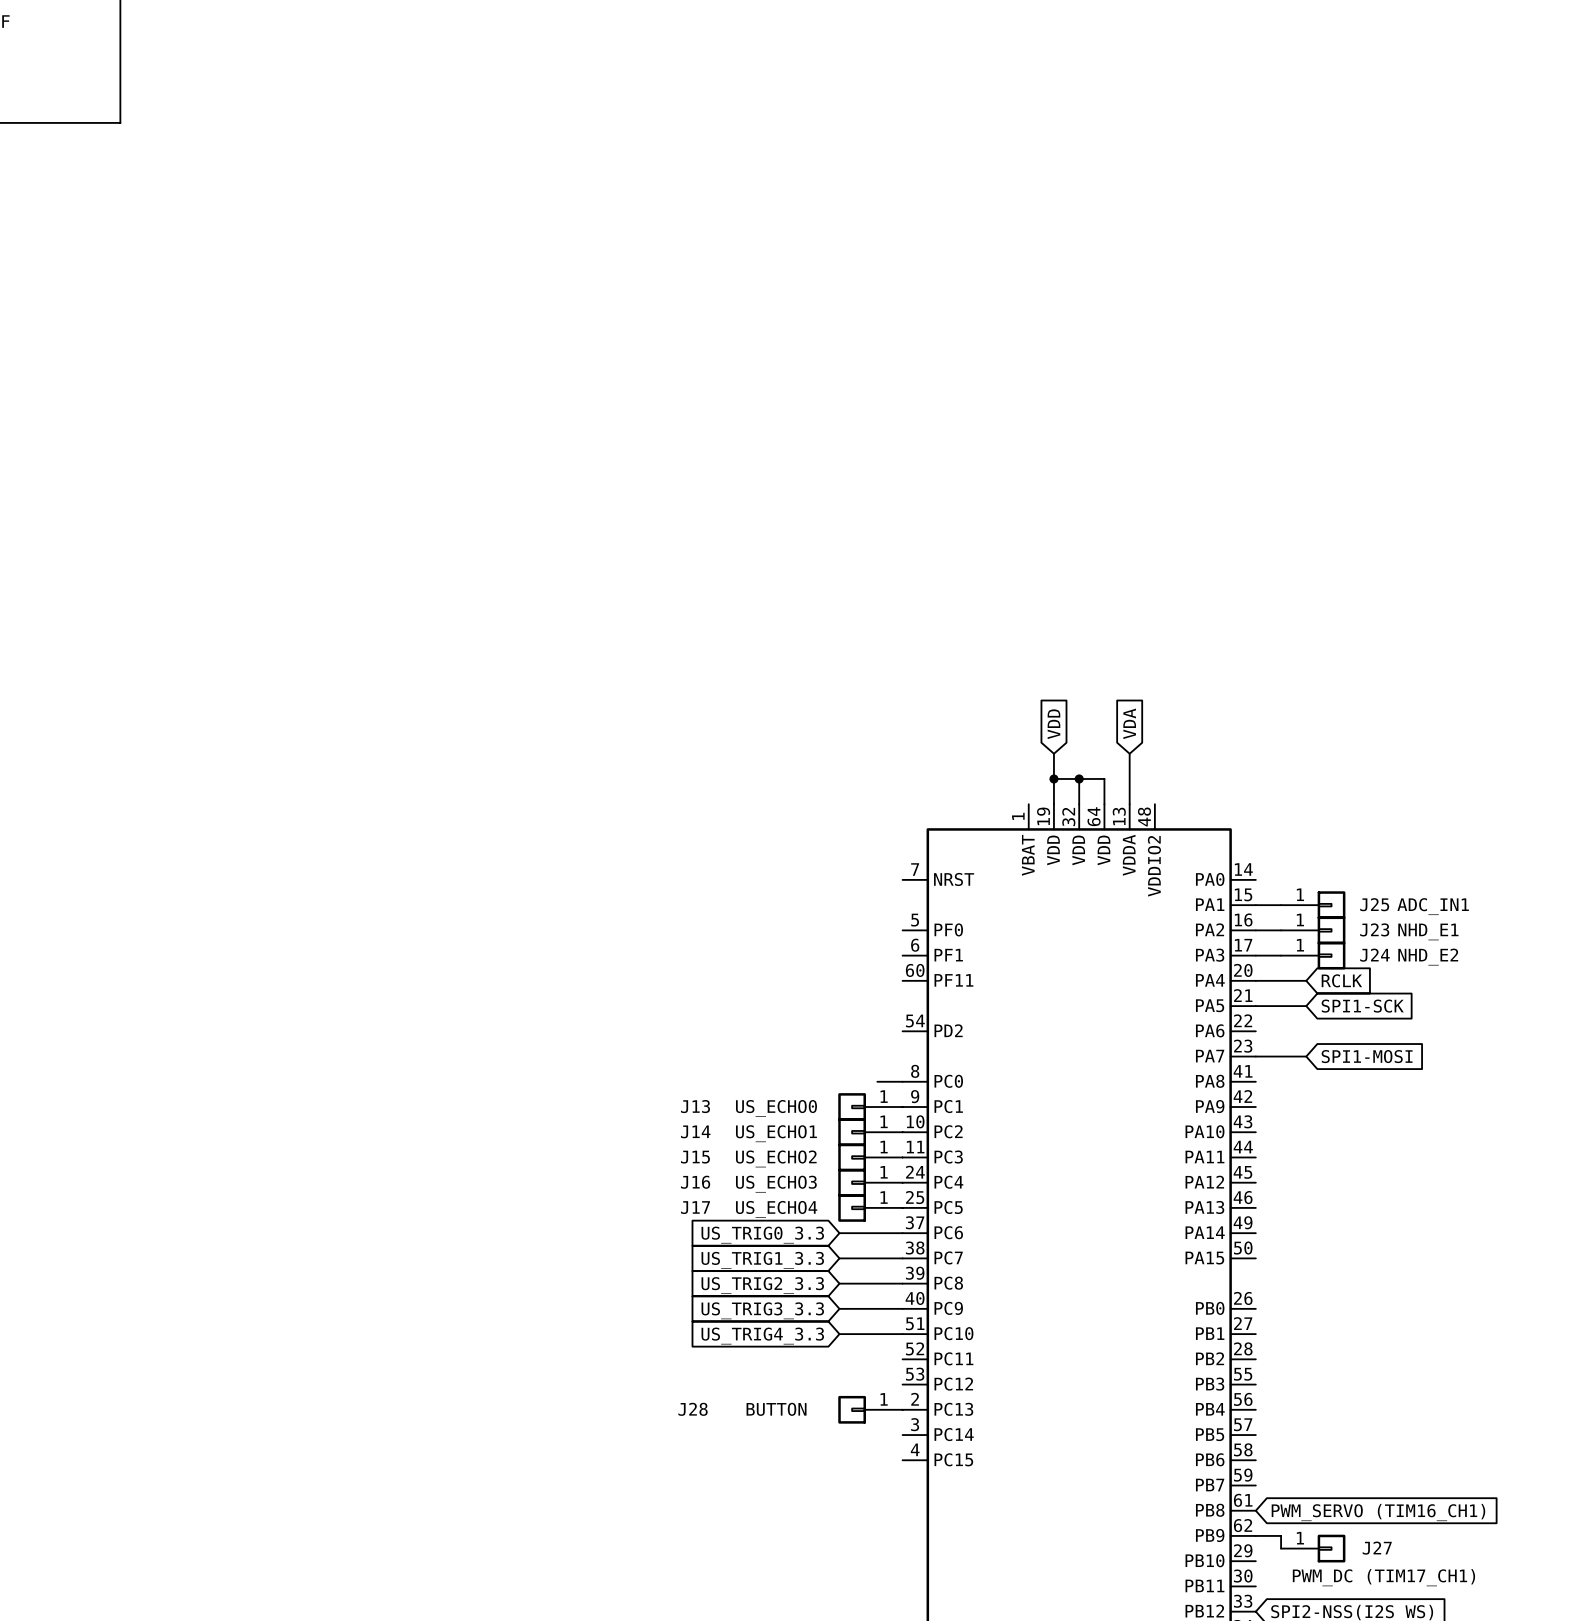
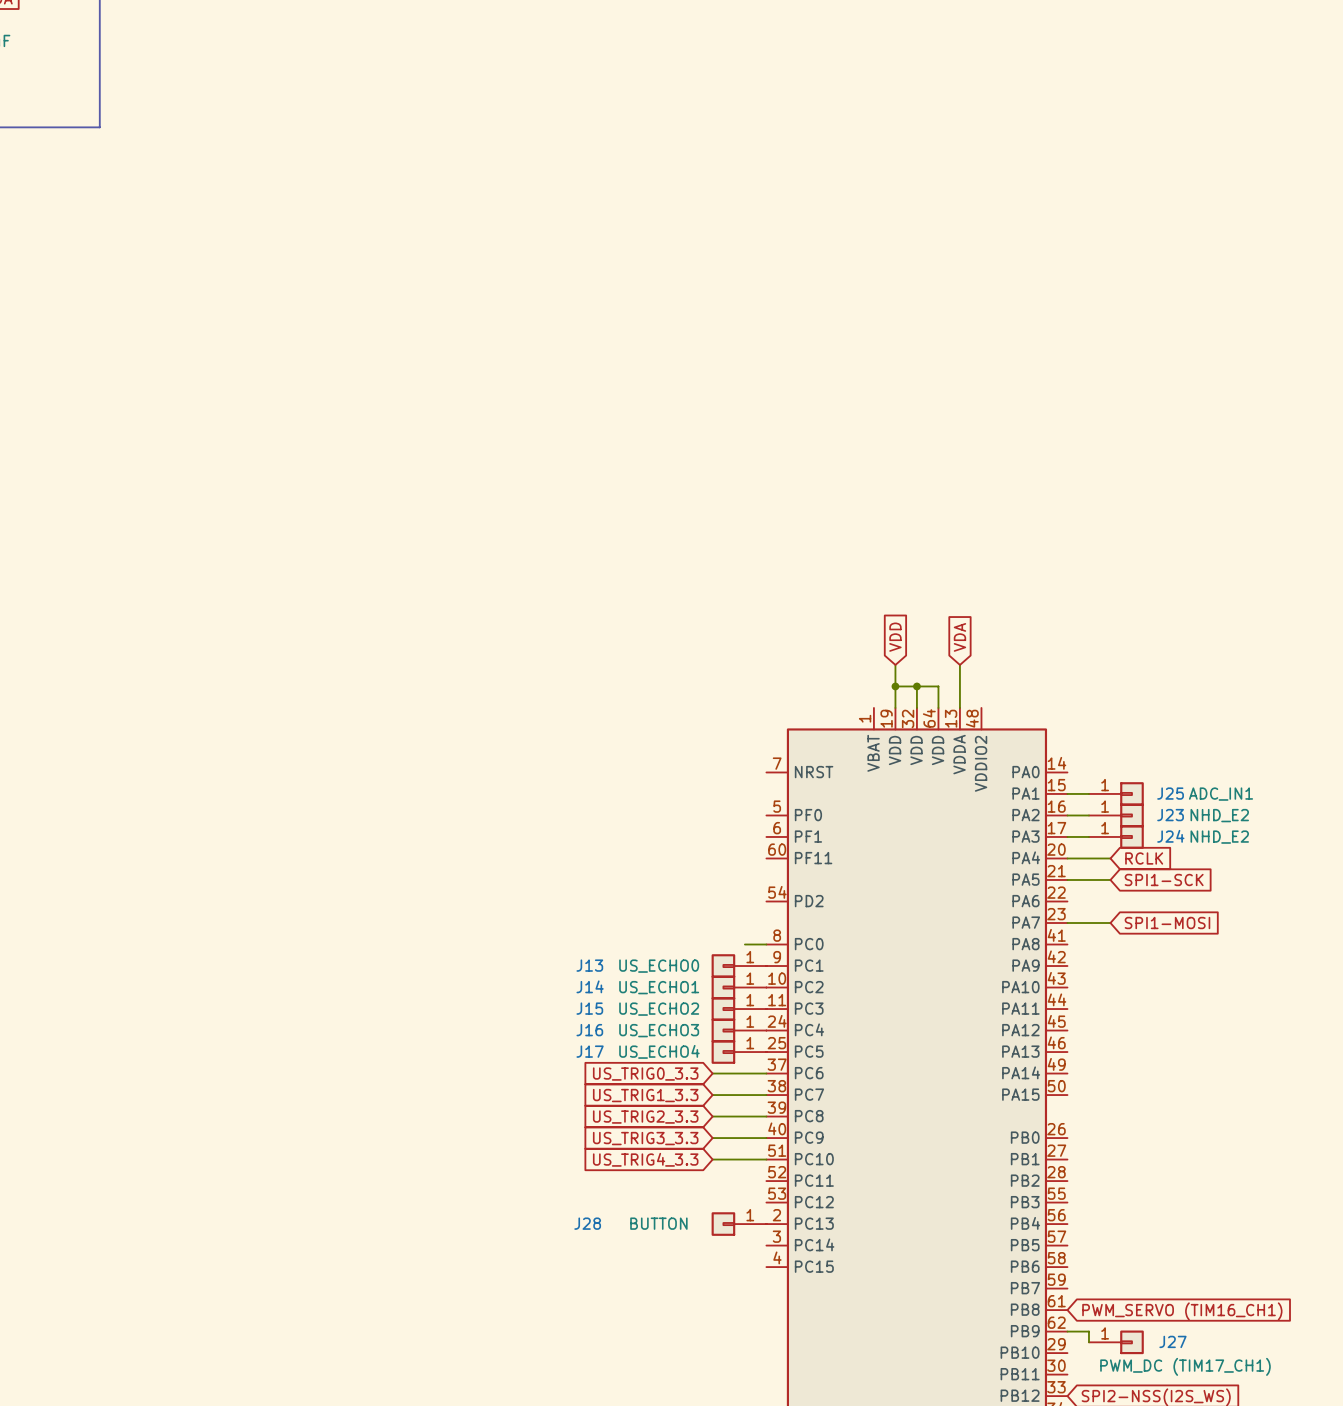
J23 value: NHD_E1 (1428, 931) -> NHD_E2 (1219, 815)

